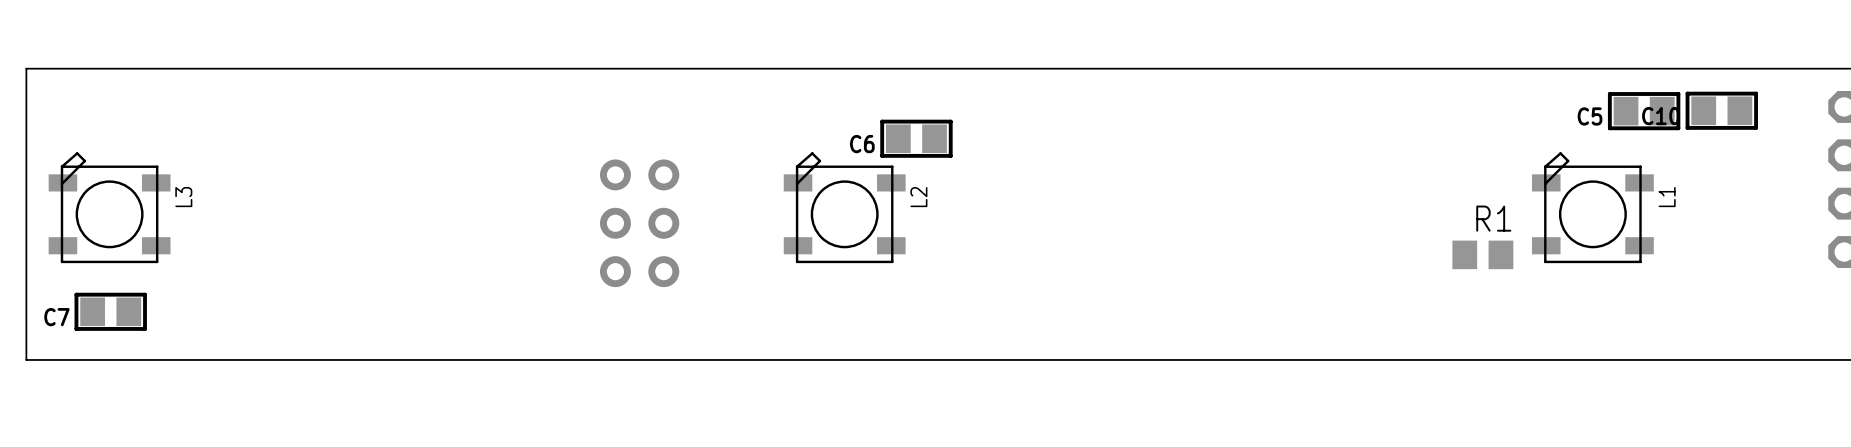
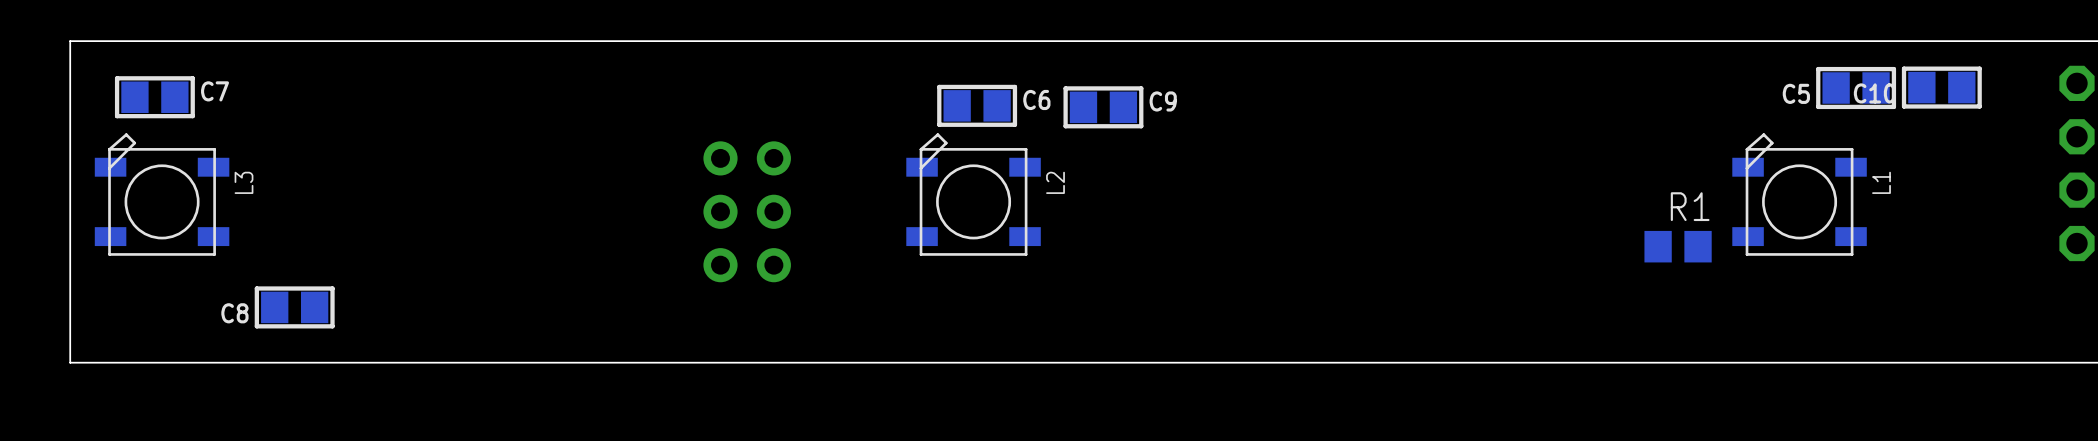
C9: none -> (1103, 107)
C6 position: (916, 138) -> (977, 105)
C6 name position: C6 (862, 144) -> C6 (1036, 99)
C8: none -> (294, 307)
C7 position: (110, 311) -> (154, 97)
C7 name position: C7 (56, 317) -> C7 (215, 91)

